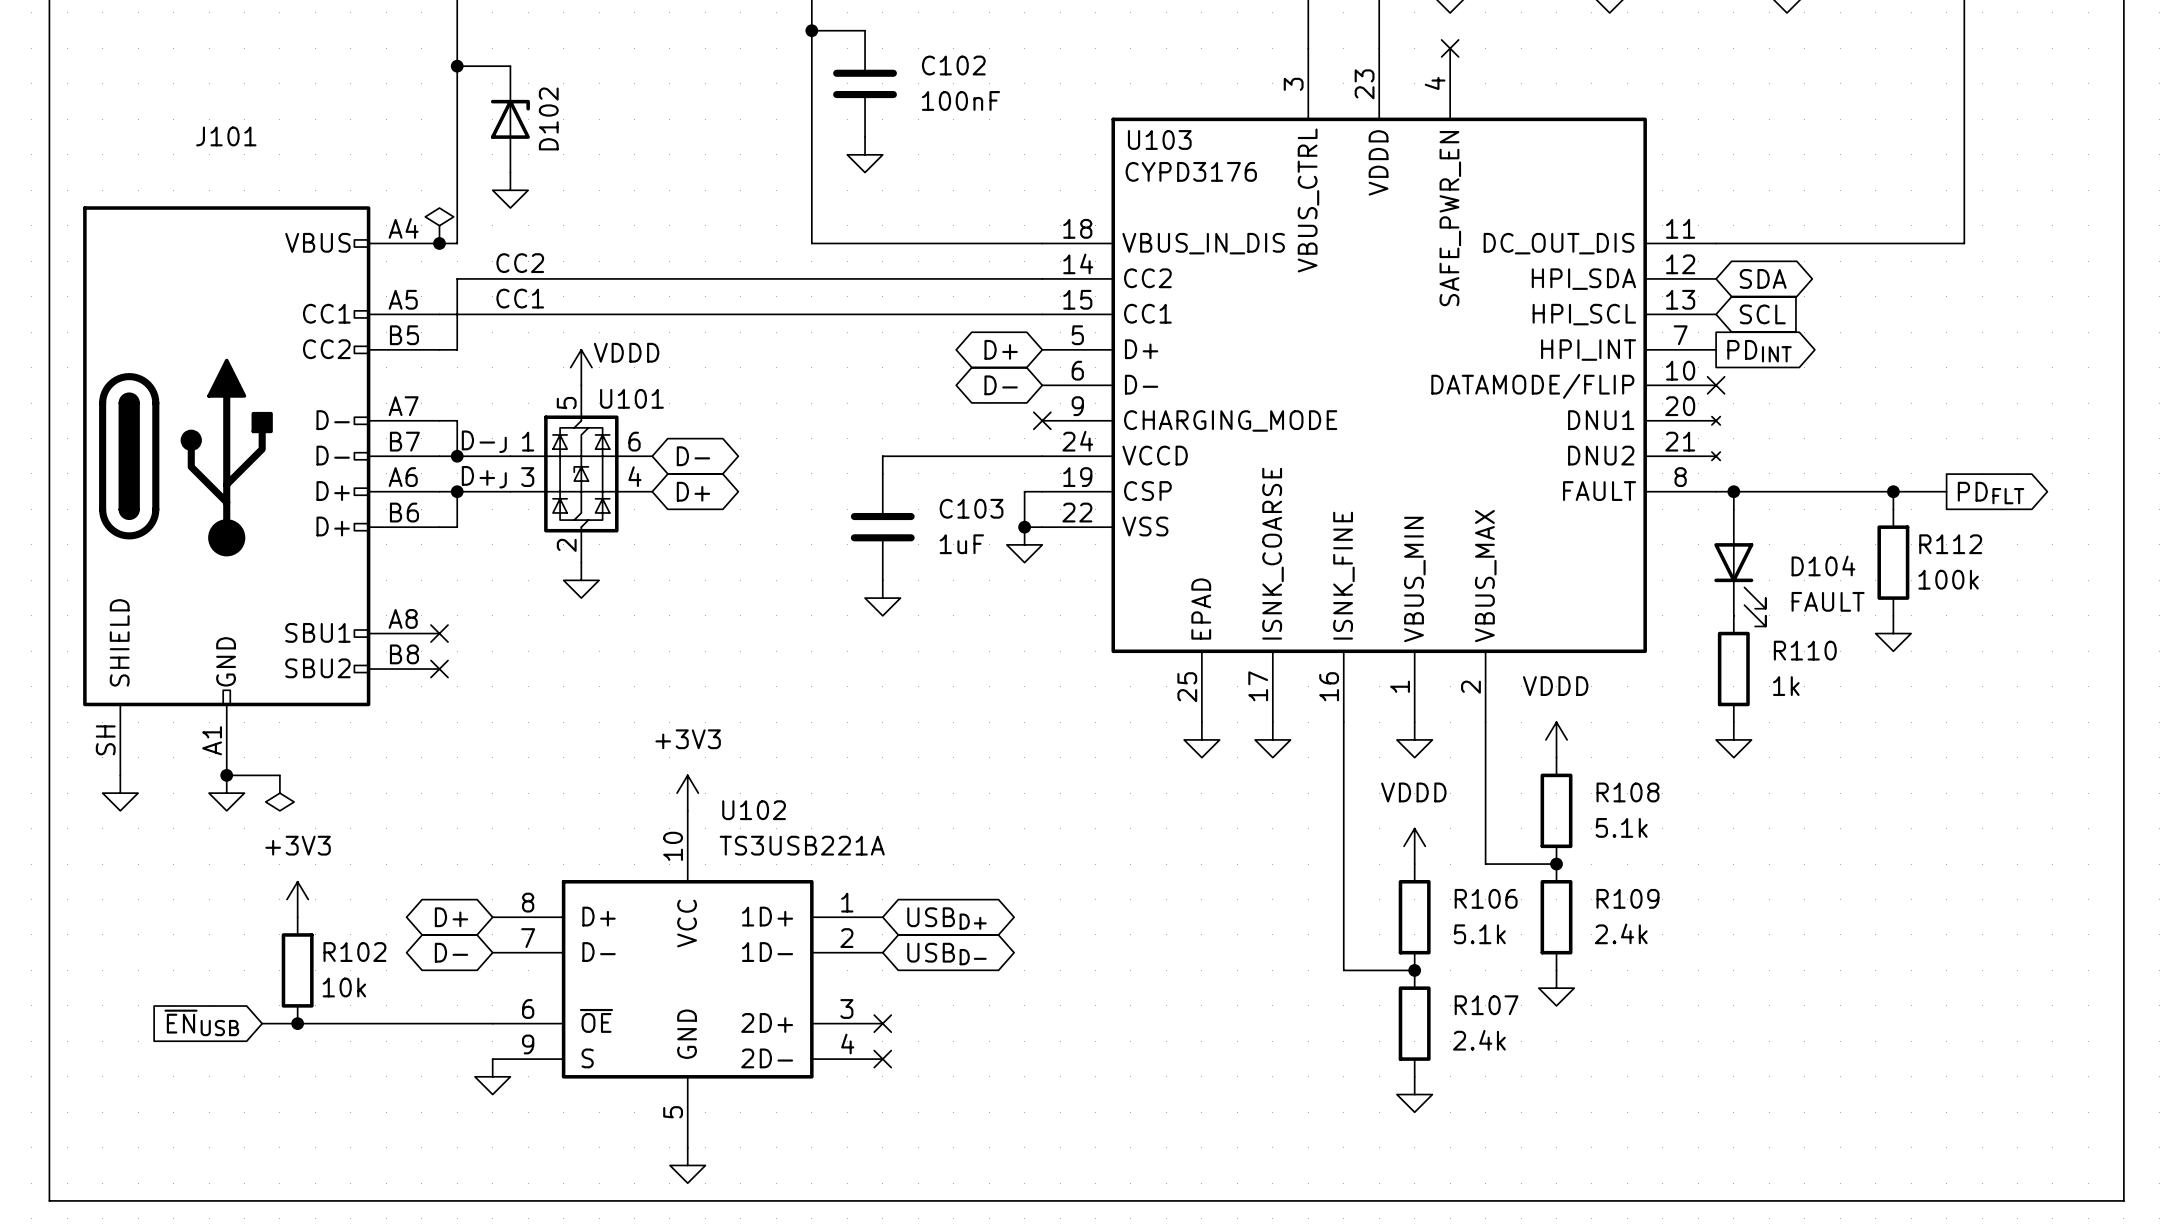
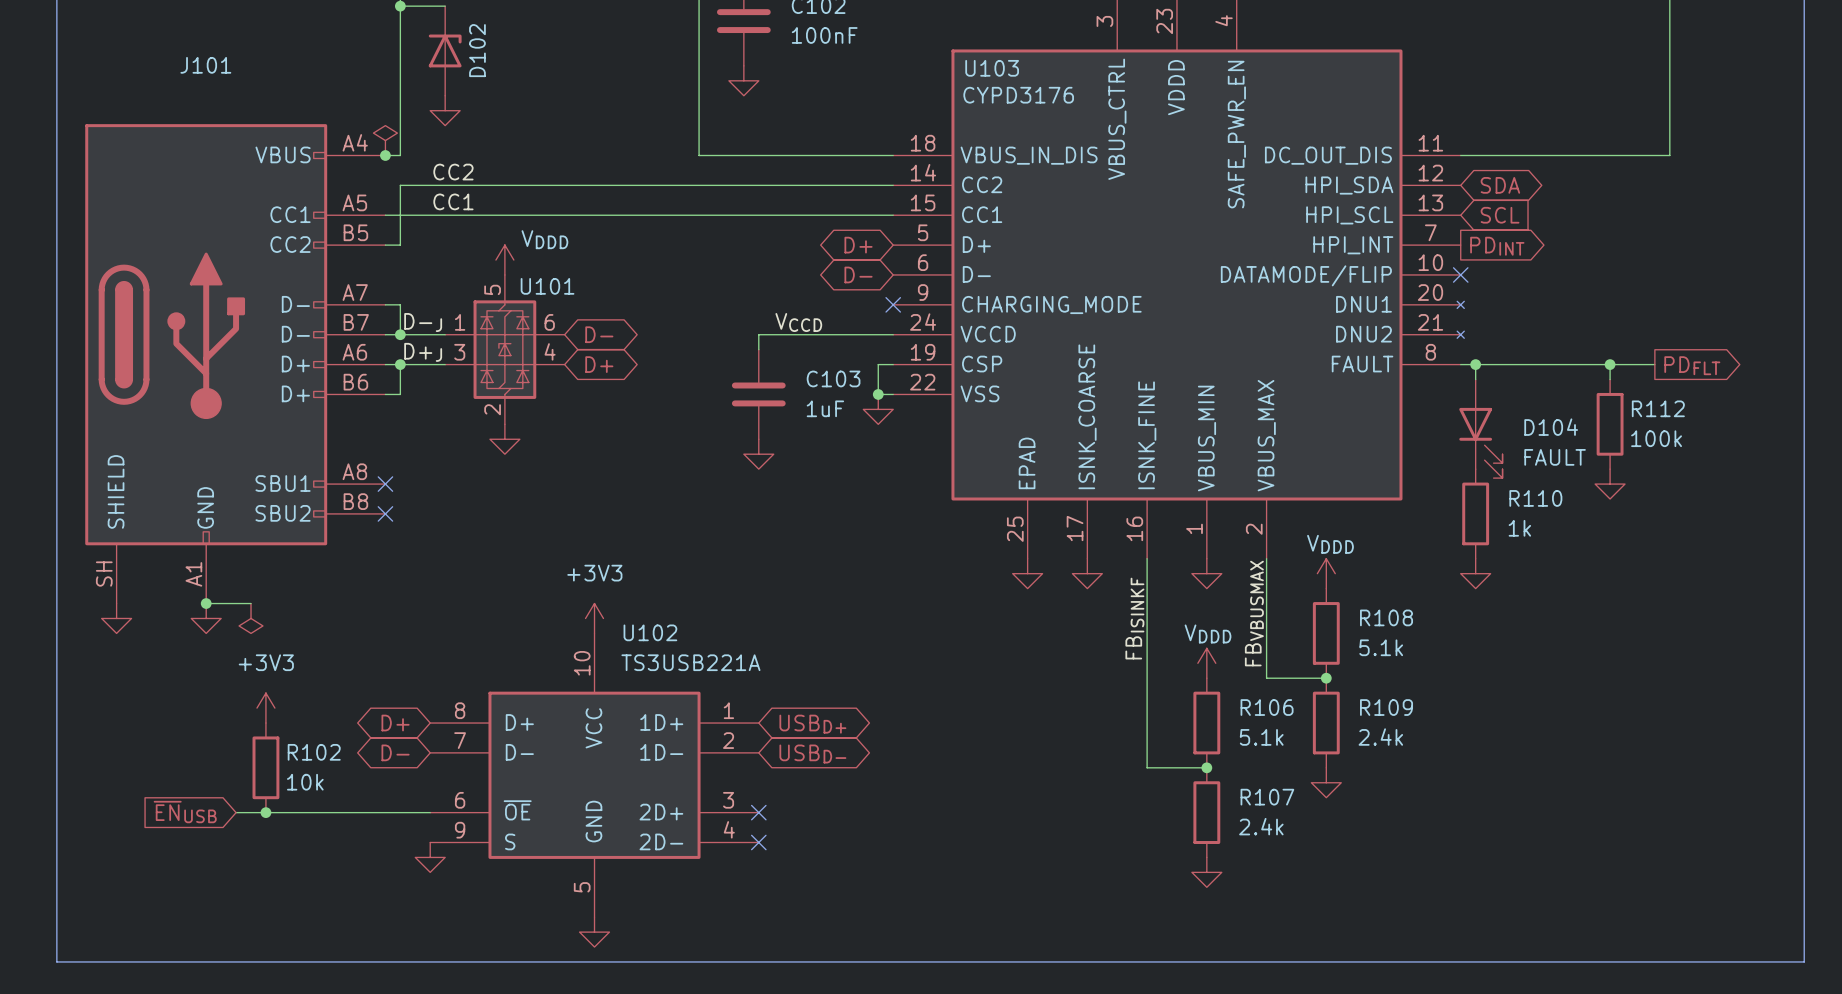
power symbol: VDDD (581, 367) -> VDDD (504, 260)
label: none -> VCCD (798, 322)
power symbol: VDDD (1556, 739) -> VDDD (1326, 573)
label: none -> FBVBUSMAX (1254, 613)
label: none -> FBISINKF (1134, 618)
power symbol: VDDD (1414, 846) -> VDDD (1206, 663)

